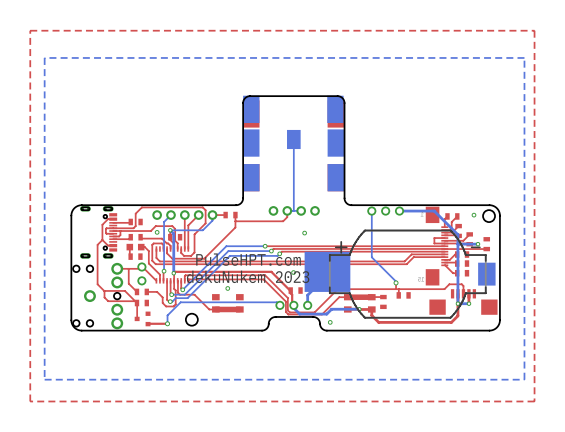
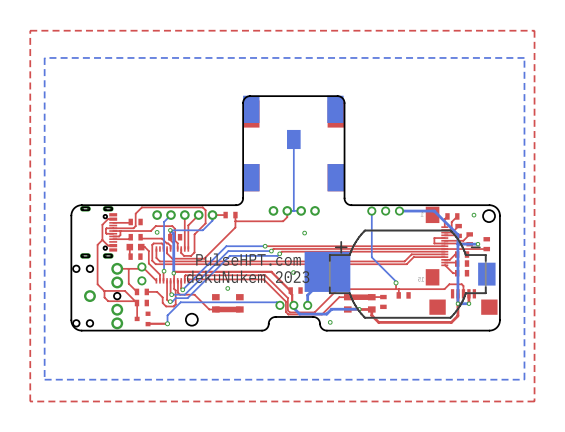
part: (251, 143) -> none
part: (335, 143) -> none

